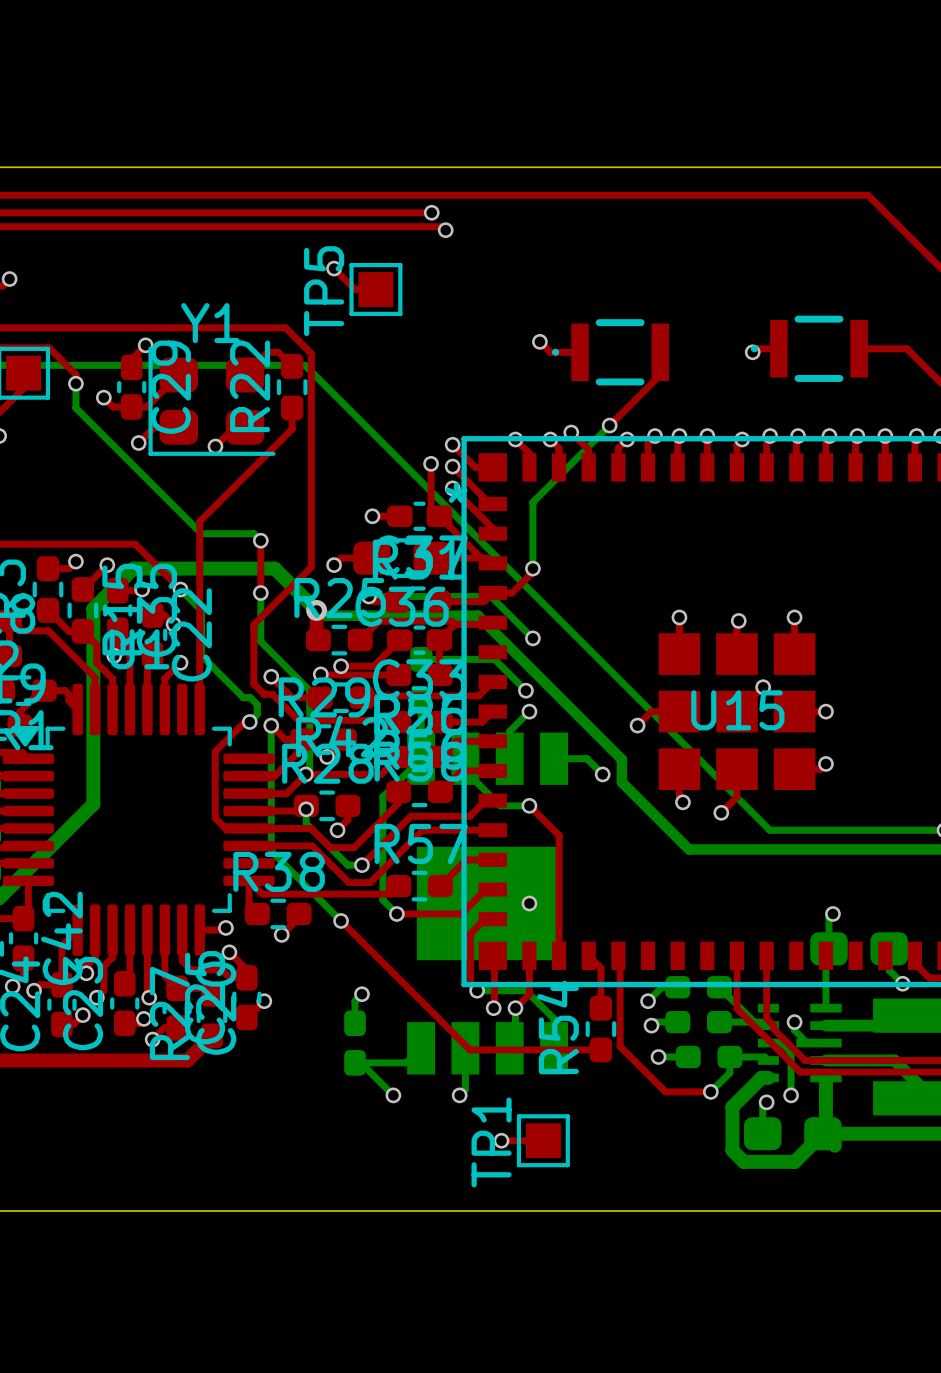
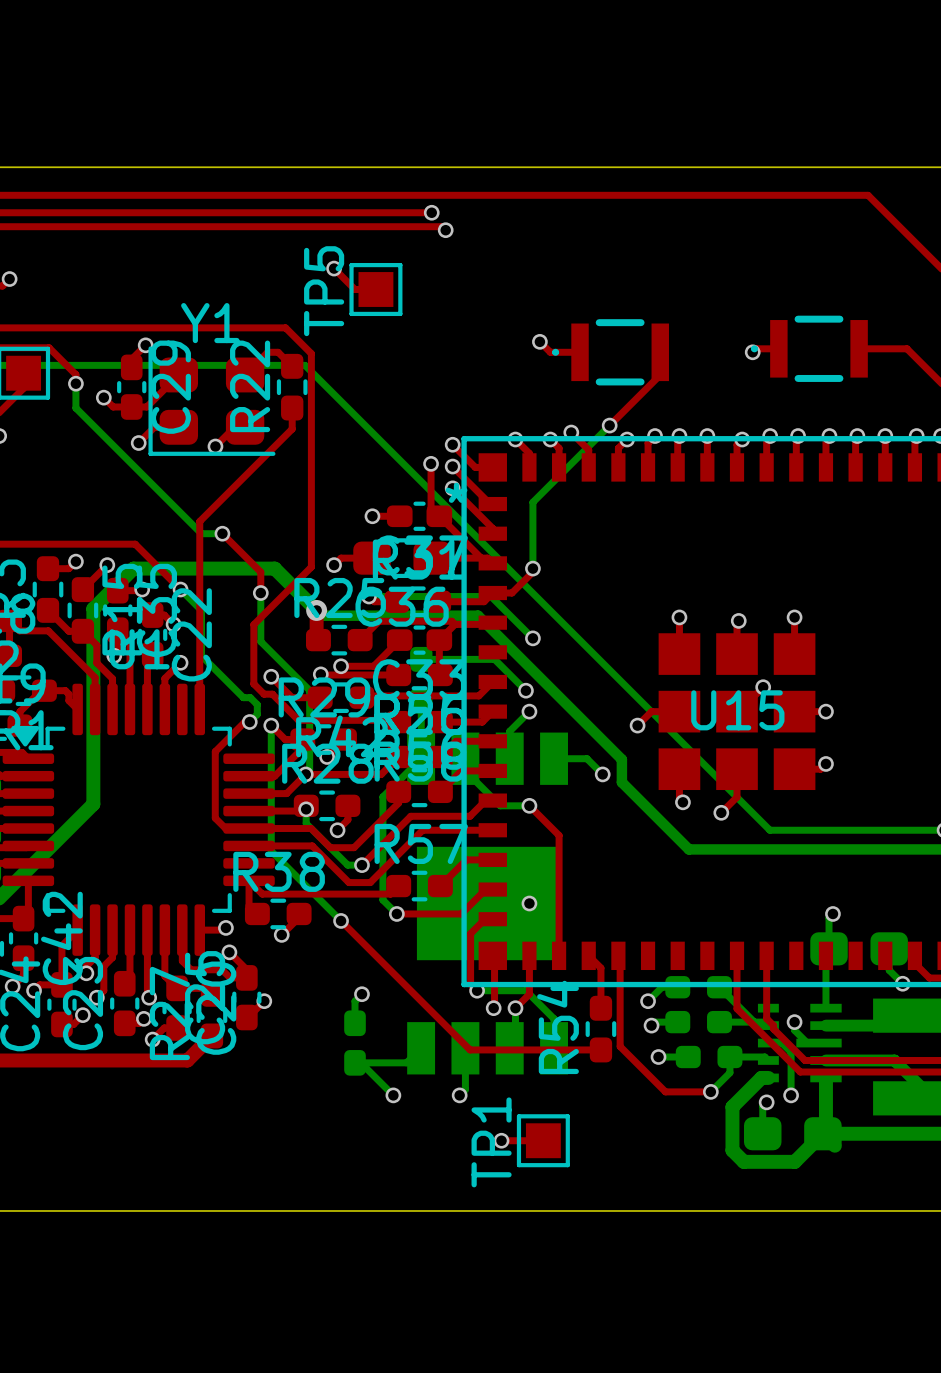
bottom track: (222, 533) (253, 533) (260, 540) -> none
top track: (260, 540) (260, 572) -> (222, 533) (260, 572)
via position: (260, 540) -> (222, 533)

